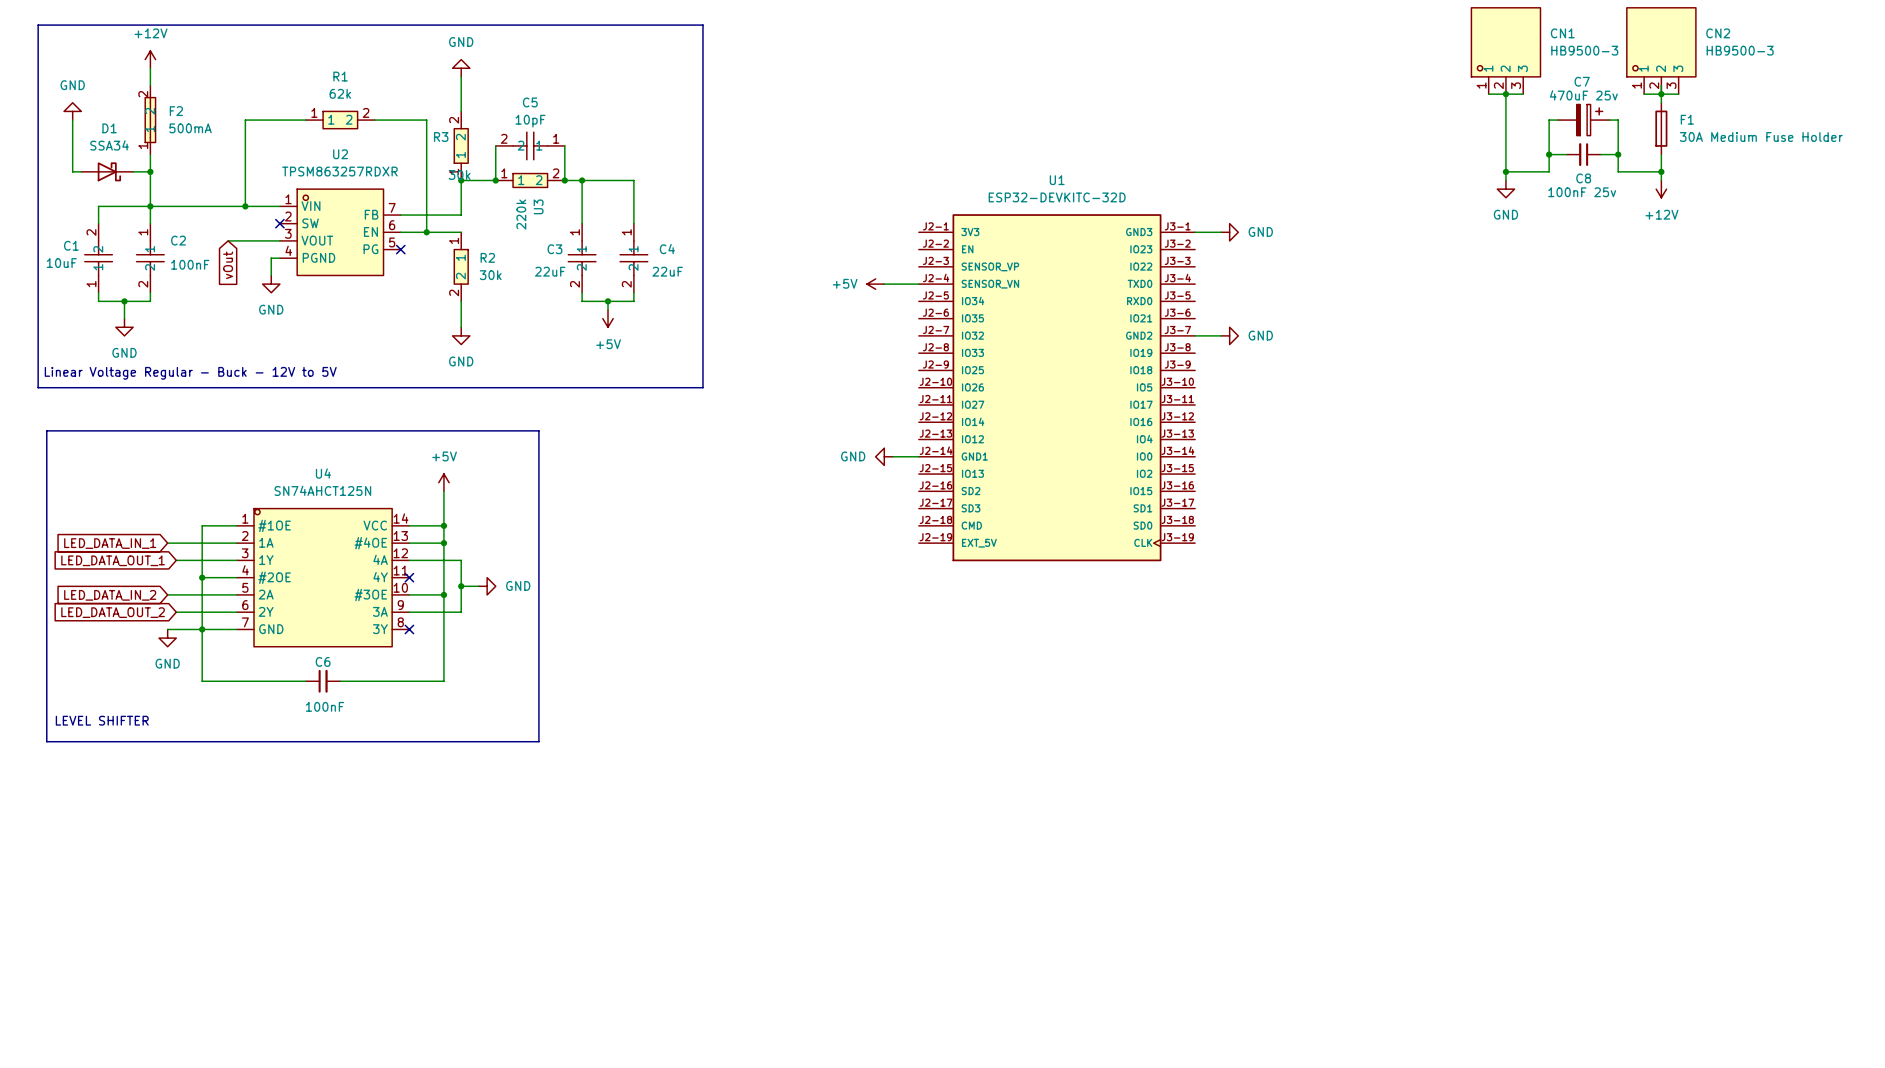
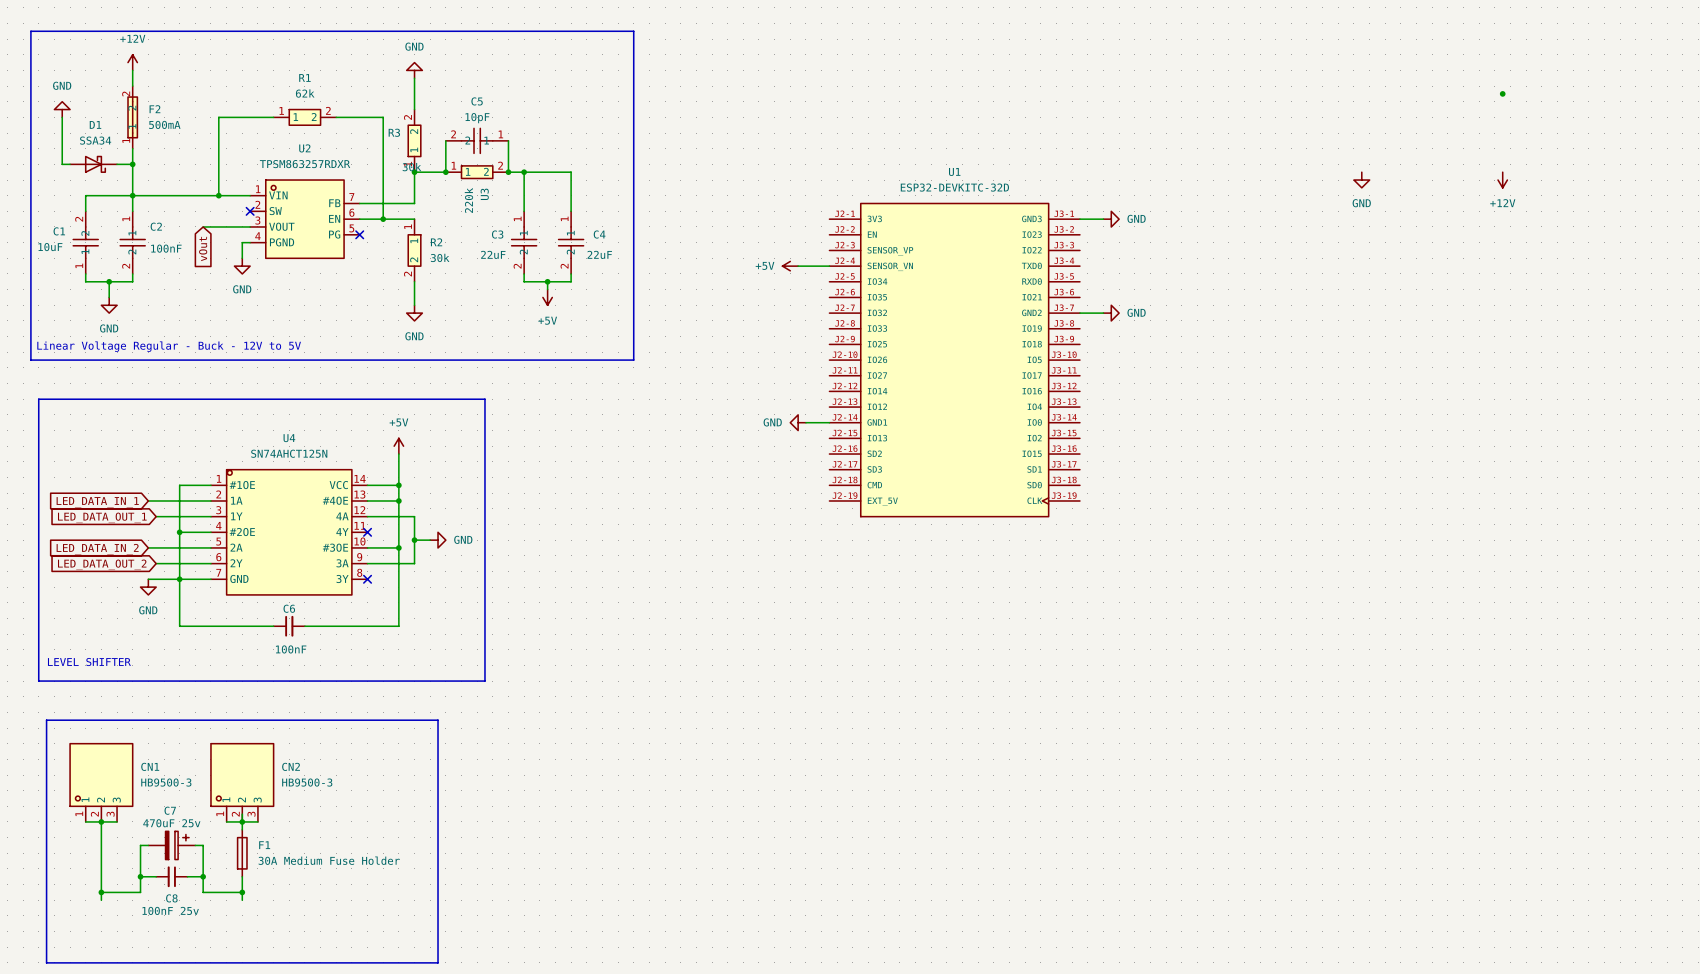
CN1 position: (1505, 50) -> (101, 782)
CN2 position: (1661, 50) -> (242, 782)
wire: (1661, 85) (1661, 102) -> none
wire: (1488, 94) (1523, 94) -> none
wire: (1505, 94) (1505, 180) -> none
junction: (1505, 94) -> none
wire: (1644, 94) (1678, 94) -> none
wire: (1557, 120) (1549, 120) (1549, 171) (1505, 171) -> none
C7 position: (1583, 120) -> (171, 845)
wire: (1609, 120) (1618, 120) (1618, 171) (1661, 171) -> none
F1 position: (1661, 128) -> (242, 853)
wire: (1549, 154) (1566, 154) -> none
junction: (1549, 154) -> none
C8 position: (1583, 154) -> (171, 876)
wire: (1600, 154) (1618, 154) -> none
junction: (1618, 154) -> none
wire: (1661, 154) (1661, 180) -> none
junction: (1505, 171) -> none
junction: (1661, 171) -> none
line: none -> (46, 720) (438, 720) (438, 962) (46, 962) (46, 720)
wire: none -> (242, 814) (242, 829)
wire: none -> (85, 821) (117, 821)
wire: none -> (101, 821) (101, 900)
junction: none -> (101, 821)
wire: none -> (226, 821) (257, 821)
junction: none -> (242, 821)
wire: none -> (148, 845) (140, 845) (140, 892) (101, 892)
wire: none -> (195, 845) (203, 845) (203, 892) (242, 892)
wire: none -> (140, 876) (156, 876)
junction: none -> (140, 876)
wire: none -> (187, 876) (203, 876)
junction: none -> (203, 876)
wire: none -> (242, 876) (242, 900)
junction: none -> (101, 892)
junction: none -> (242, 892)

